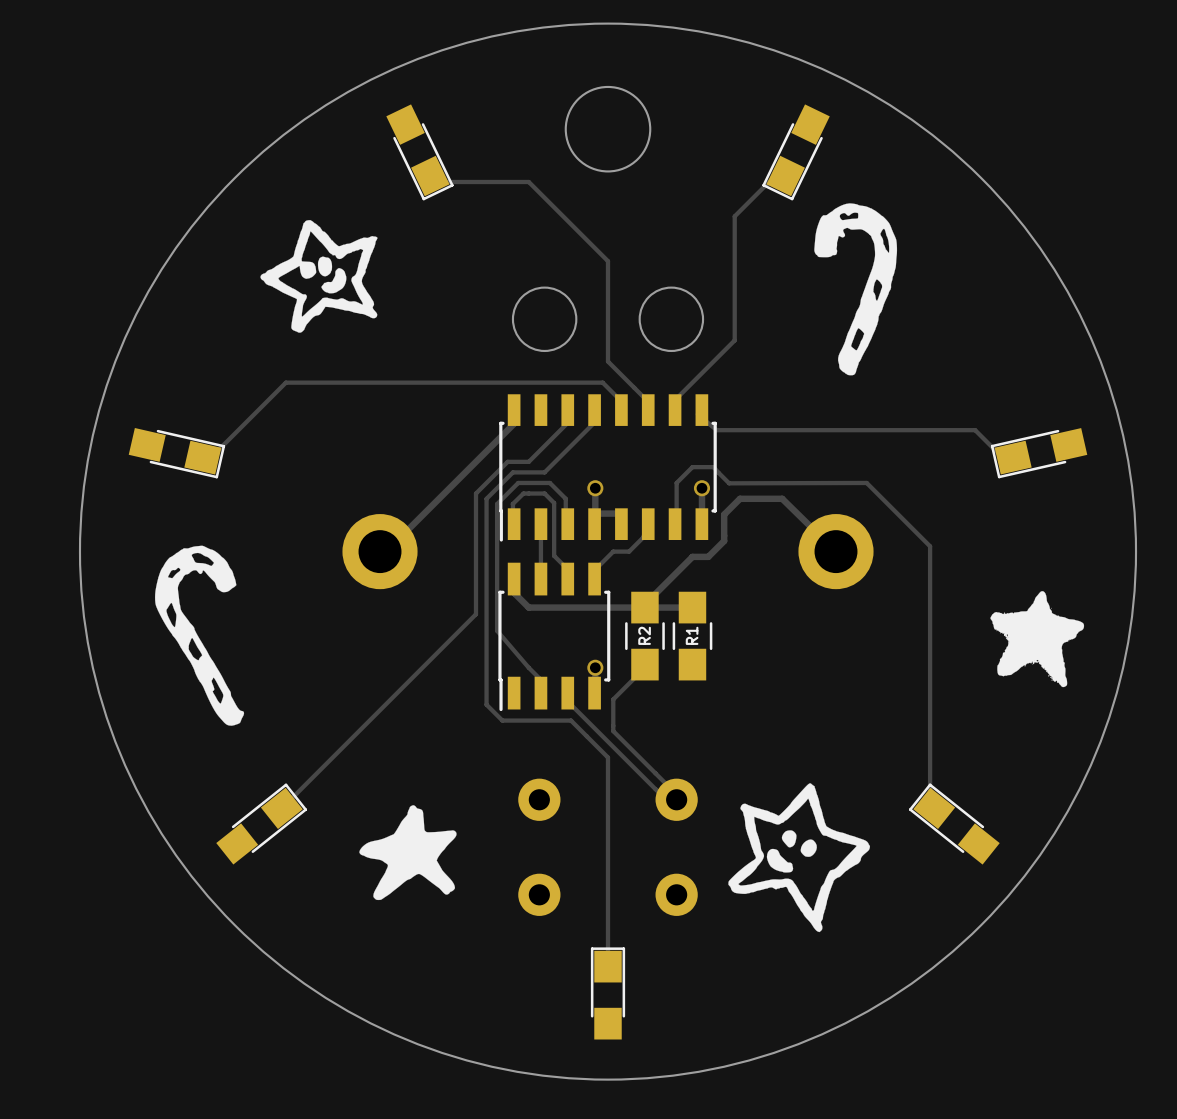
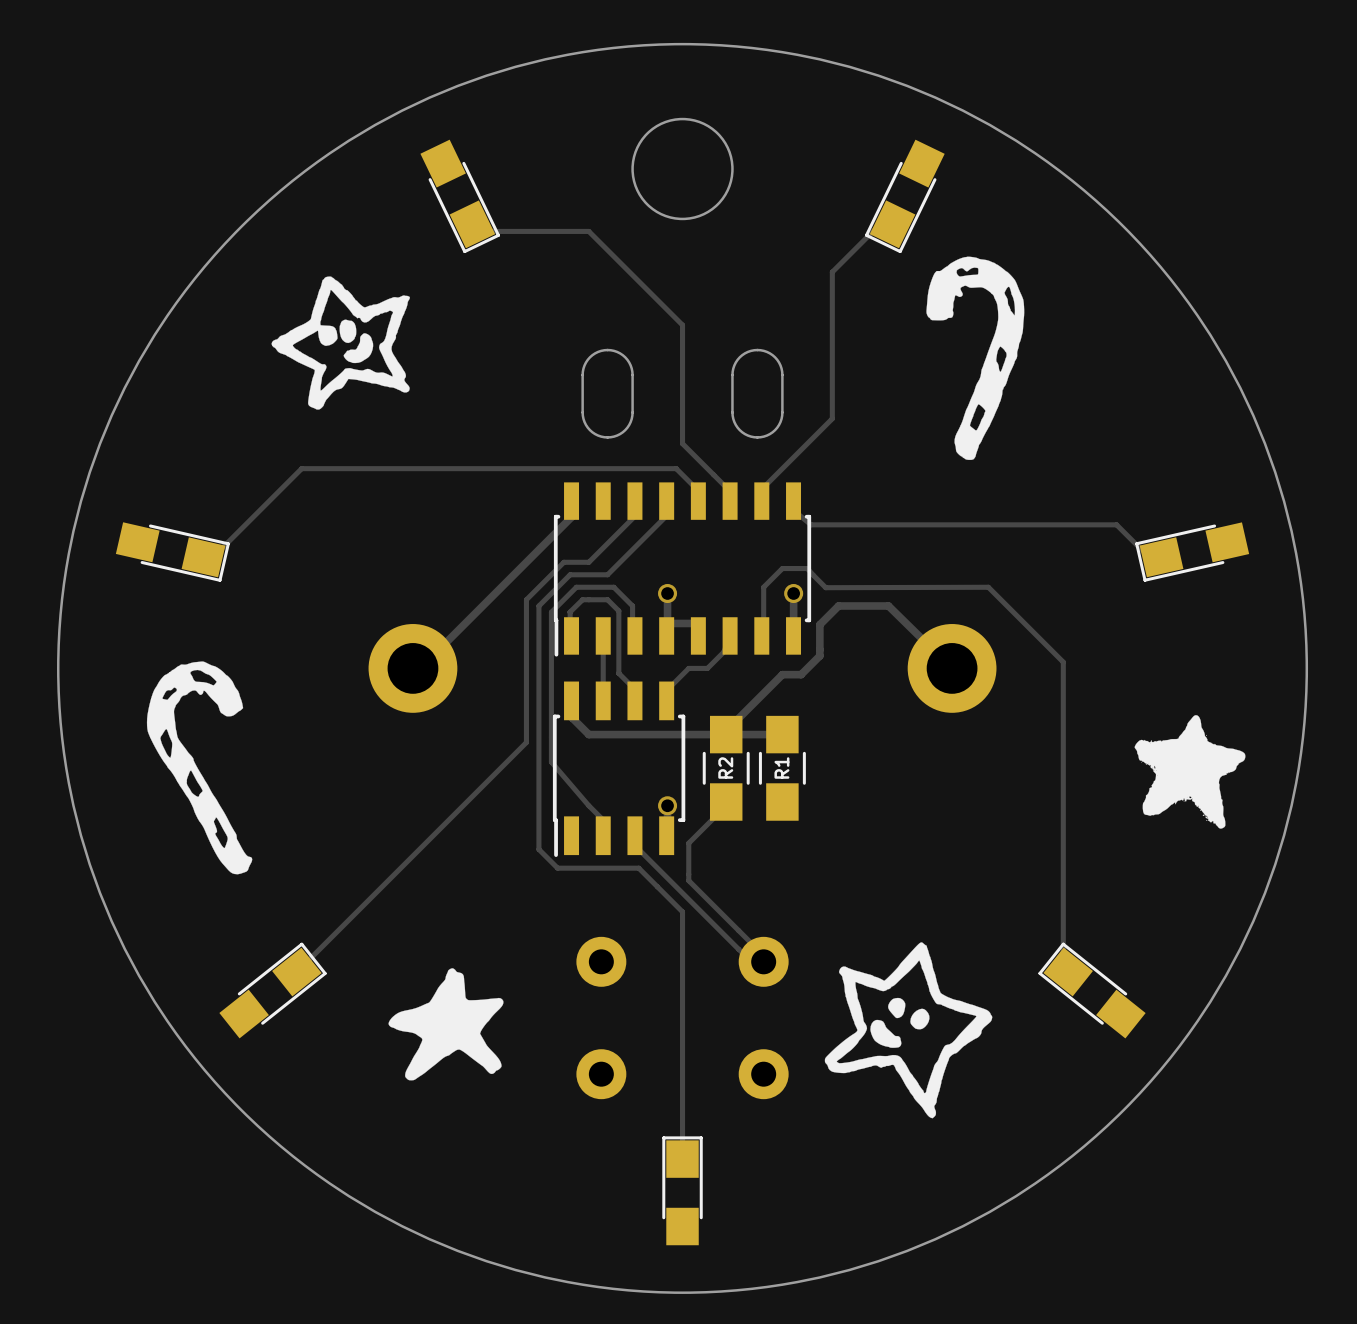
board edge: none -> (607, 350) (598, 351) (589, 357) (584, 365) (582, 375) (582, 412) (584, 422) (592, 432) (607, 437) (617, 435) (625, 430) (630, 422) (632, 412) (632, 375) (630, 365) (622, 355) (607, 350)
board edge: none -> (757, 350) (747, 351) (739, 357) (734, 365) (732, 375) (732, 412) (734, 422) (742, 432) (757, 437) (766, 435) (775, 430) (780, 422) (782, 412) (782, 375) (780, 365) (772, 355) (757, 350)
round board edge: [511, 286, 578, 353] -> none
round board edge: [638, 286, 705, 353] -> none

